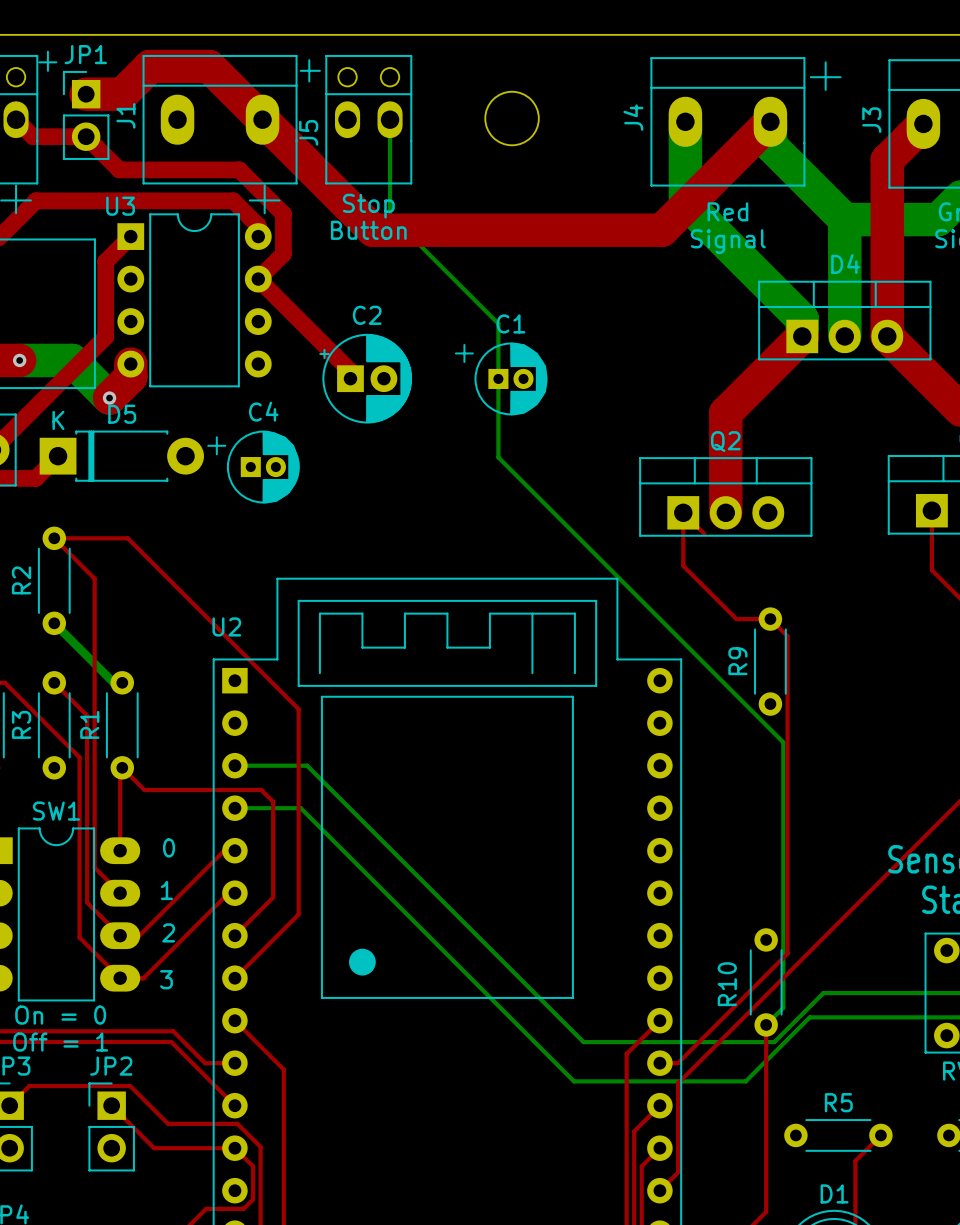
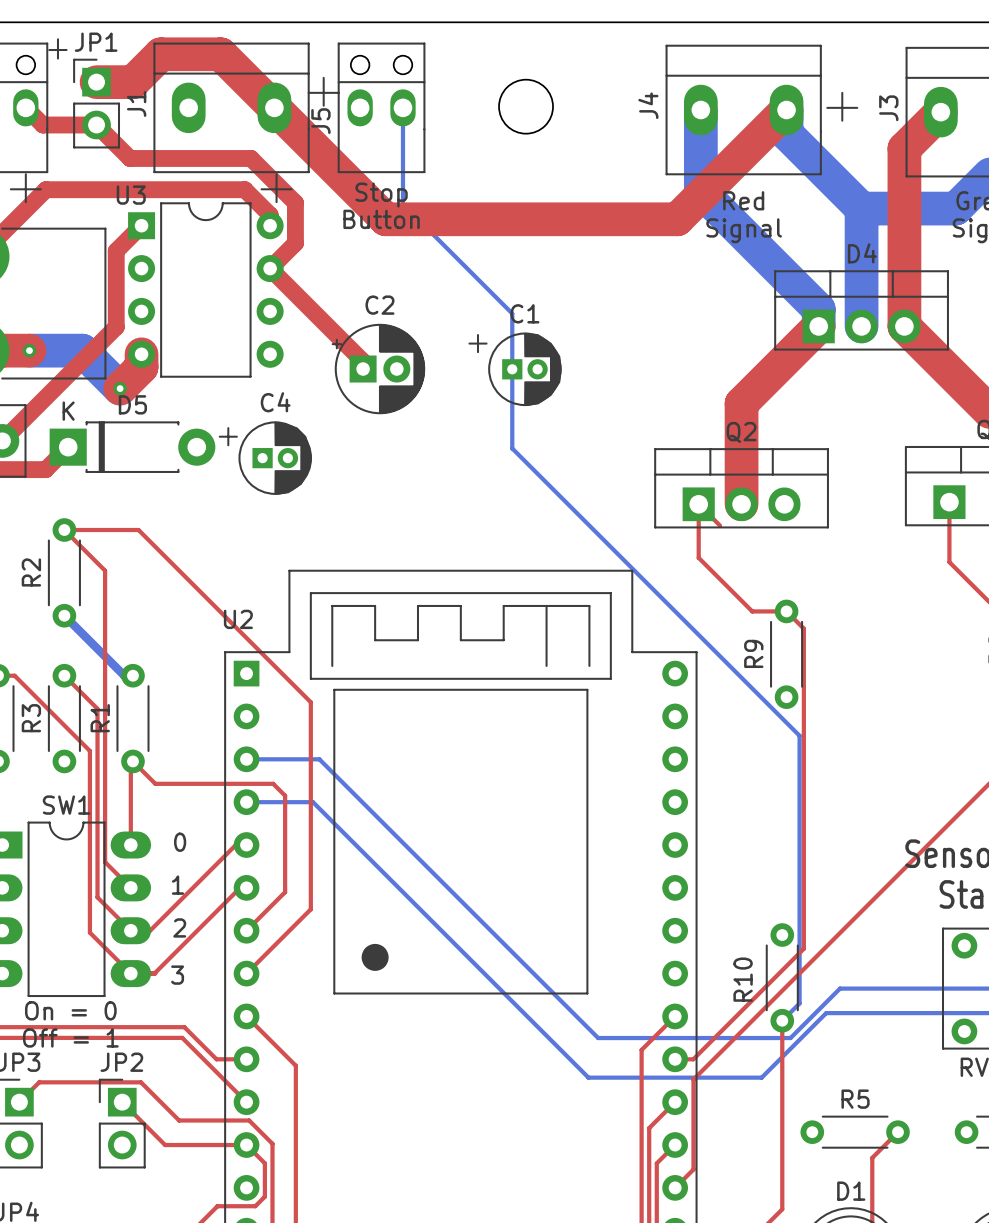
line: (309, 60) (309, 81) -> none
line: (825, 62) (825, 89) -> (842, 92) (842, 120)
line: (300, 70) (319, 70) -> none
line: (810, 77) (840, 77) -> (827, 107) (857, 107)
line: none -> (323, 77) (323, 105)
line: none -> (308, 92) (338, 92)

